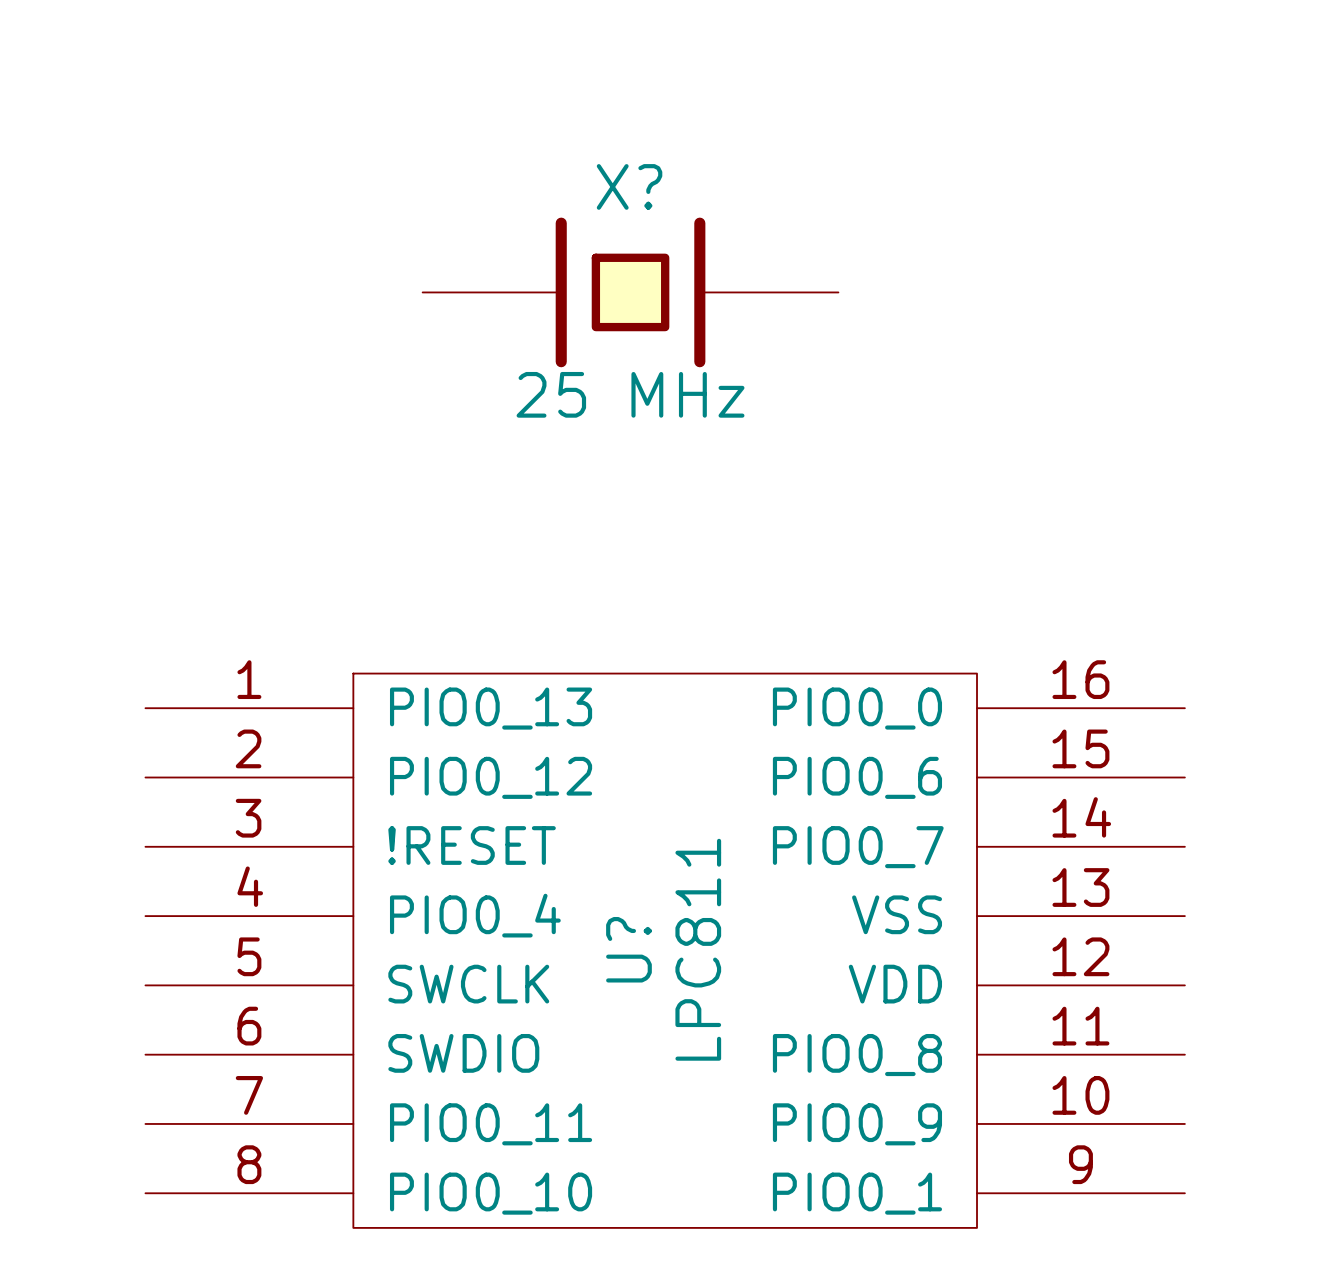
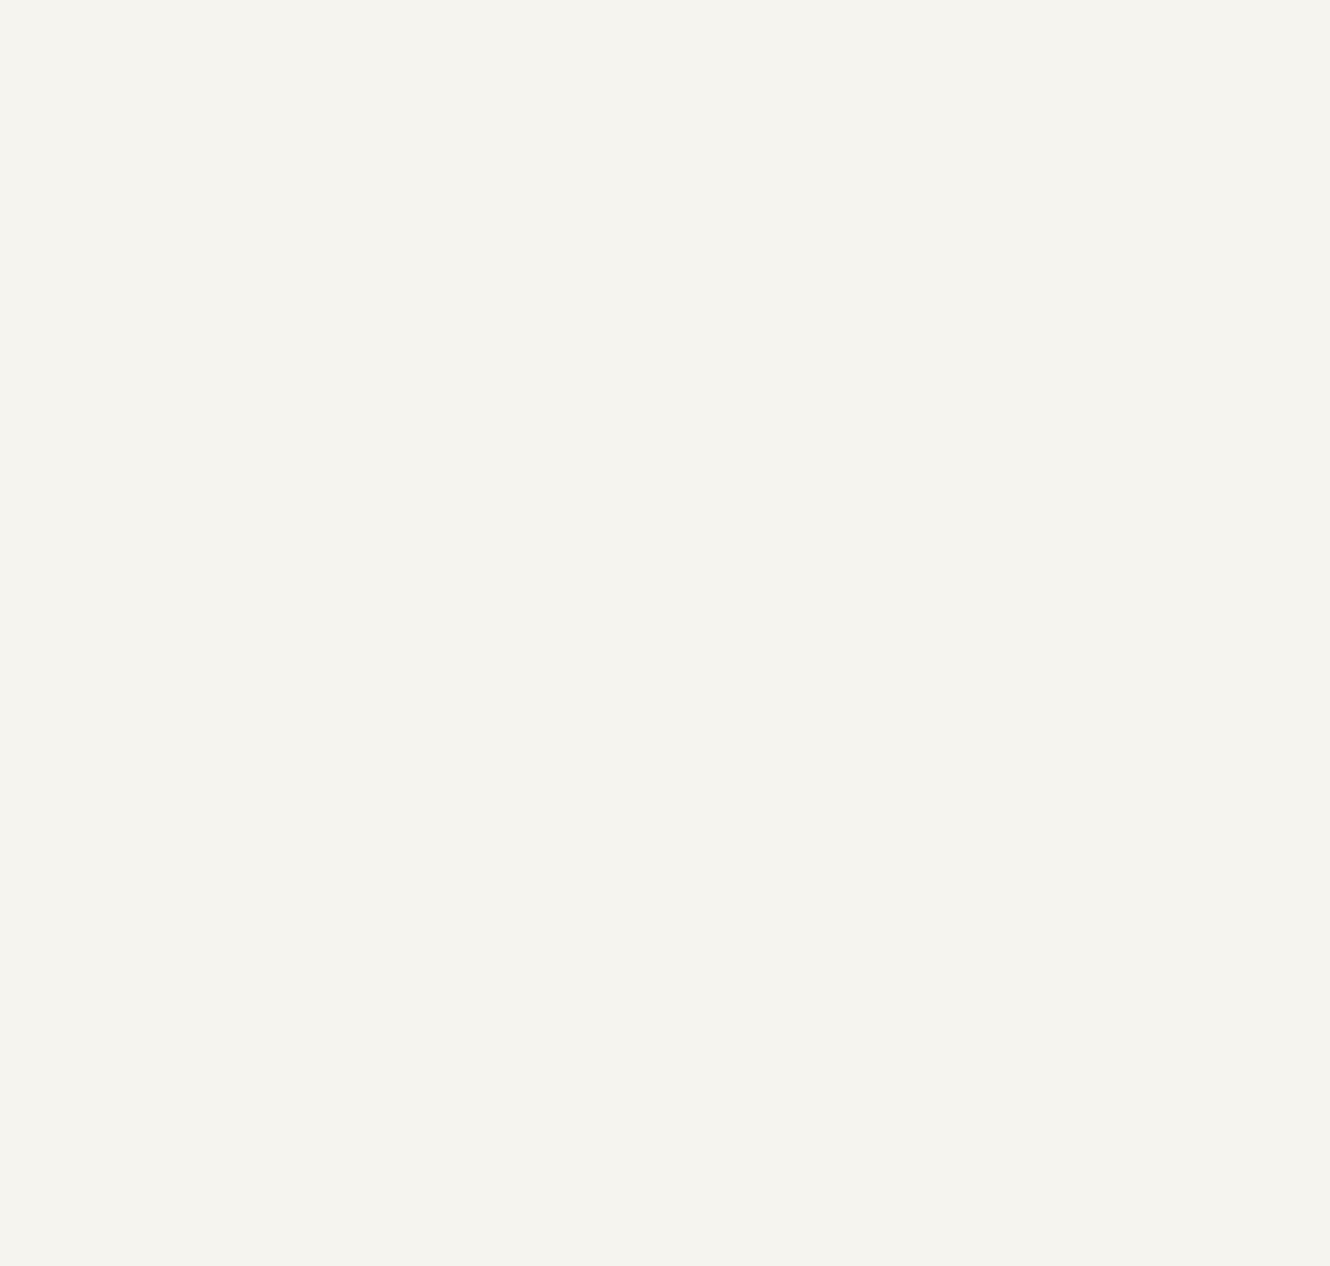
X?: 25 MHz (630, 292) -> none
U?: LPC811 (665, 950) -> none

